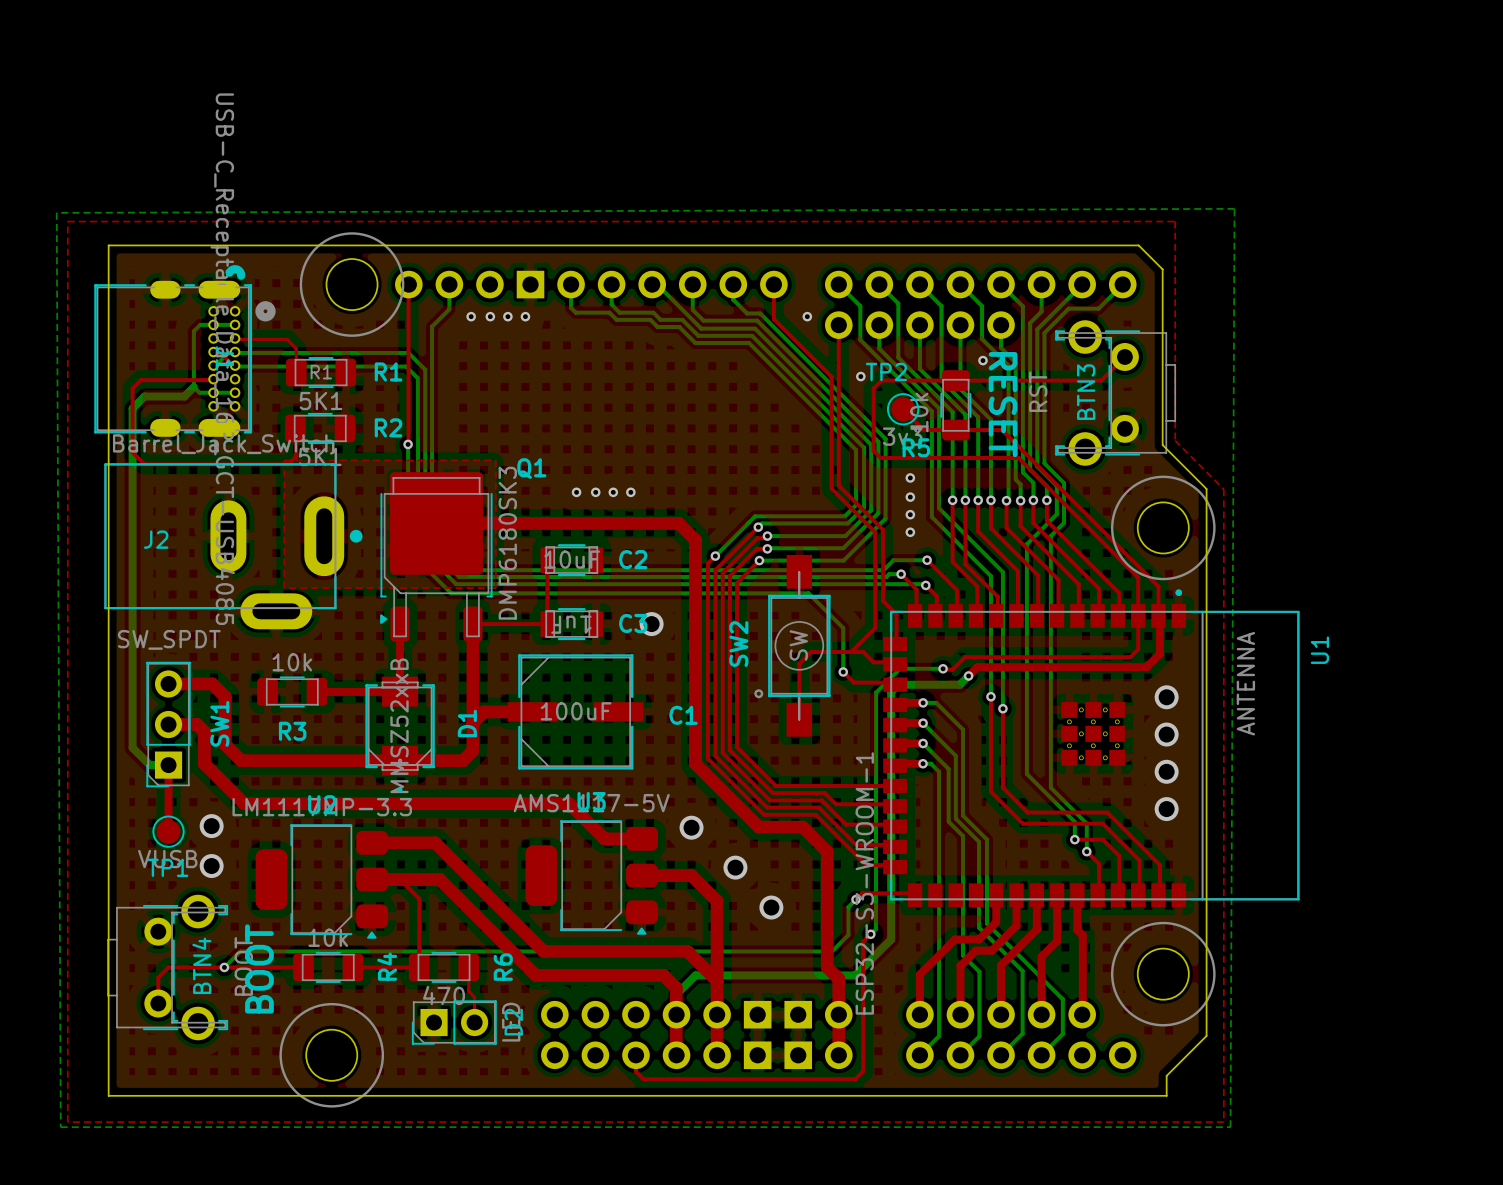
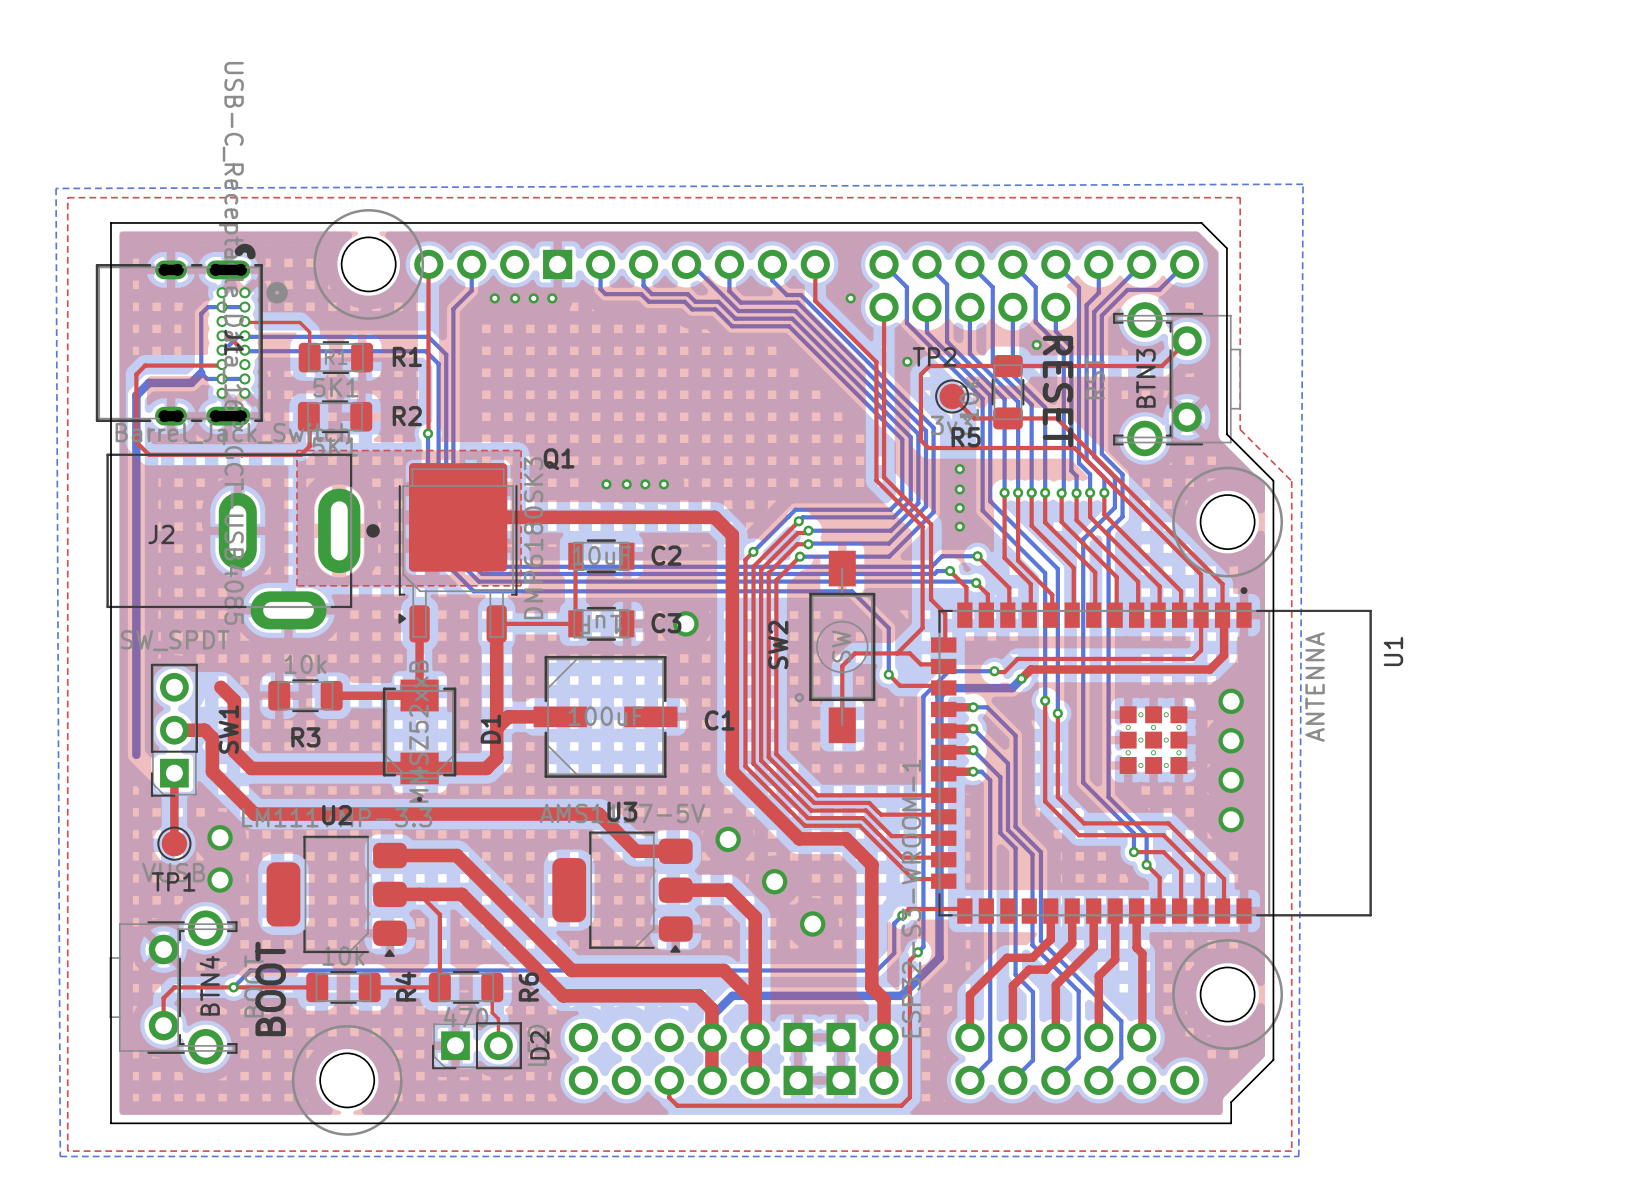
top track: (168, 683) (212, 683) -> none
bottom track: (132, 747) (149, 765) (168, 765) -> none

